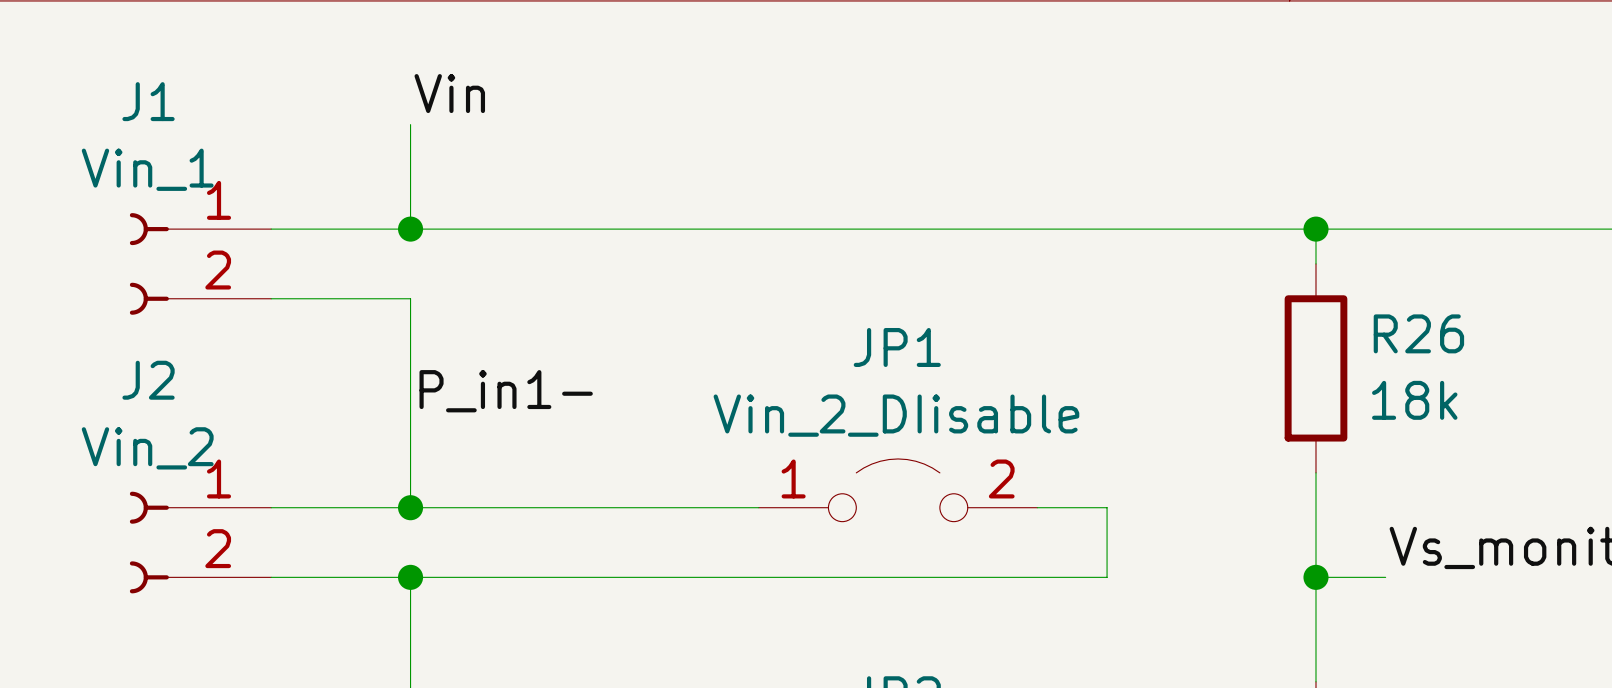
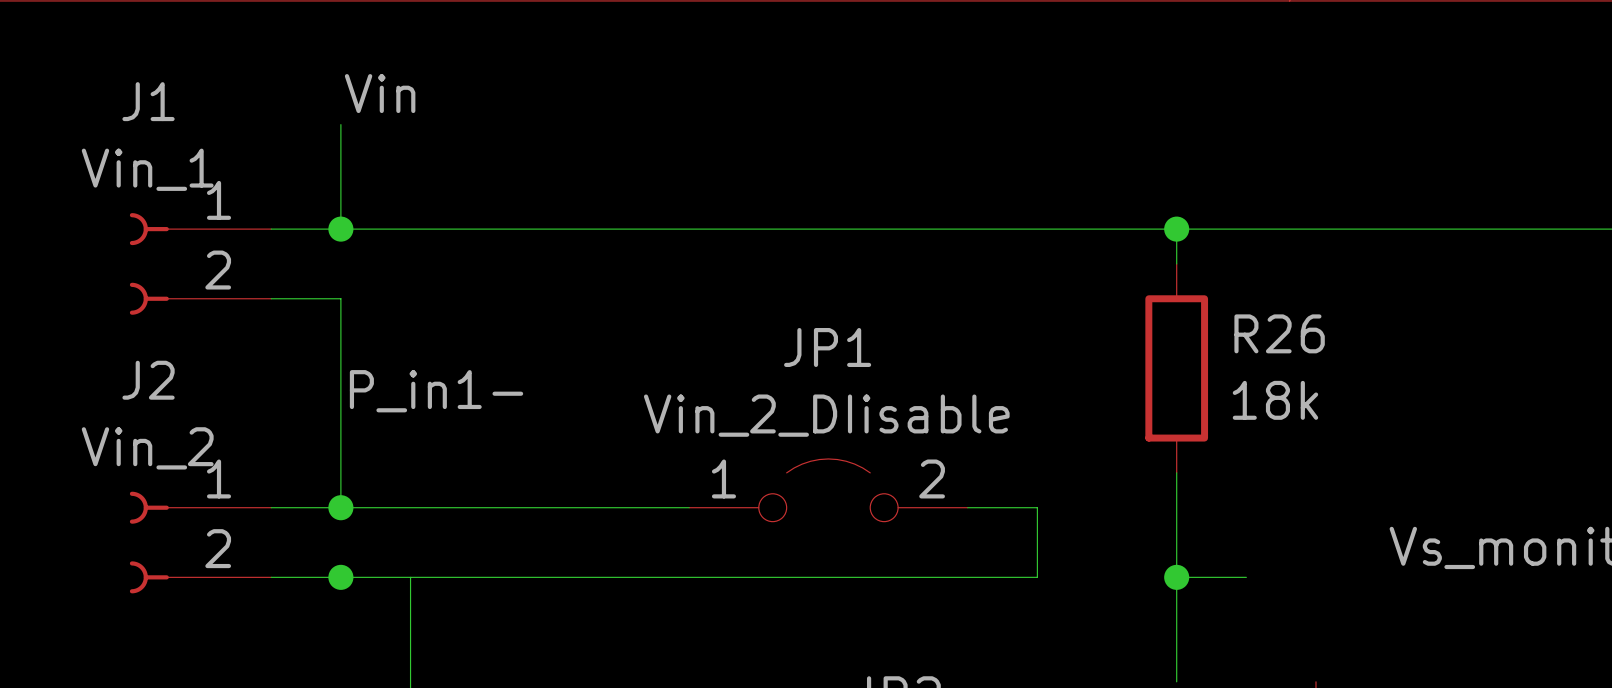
label position: Vin (449, 93) -> Vin (380, 93)
wire: (410, 124) (410, 229) -> (340, 124) (340, 229)
junction position: (410, 229) -> (340, 229)
wire: (1315, 229) (1315, 263) -> (1176, 229) (1176, 263)
junction position: (1315, 229) -> (1176, 229)
wire: (340, 298) (410, 298) (410, 507) -> (340, 298) (340, 507)
R26 position: (1315, 368) -> (1176, 368)
label position: P_in1- (506, 391) -> P_in1- (436, 391)
wire: (1315, 472) (1315, 681) -> (1176, 472) (1176, 681)
JP1 position: (898, 490) -> (828, 490)
junction: none -> (340, 507)
junction: (410, 507) -> none
wire: (1037, 507) (1107, 507) (1107, 577) (1037, 577) -> (967, 507) (1037, 507) (1037, 577)
junction: none -> (340, 577)
junction: (410, 577) -> none
wire: (1315, 577) (1385, 577) -> (1176, 577) (1246, 577)
junction position: (1315, 577) -> (1176, 577)

